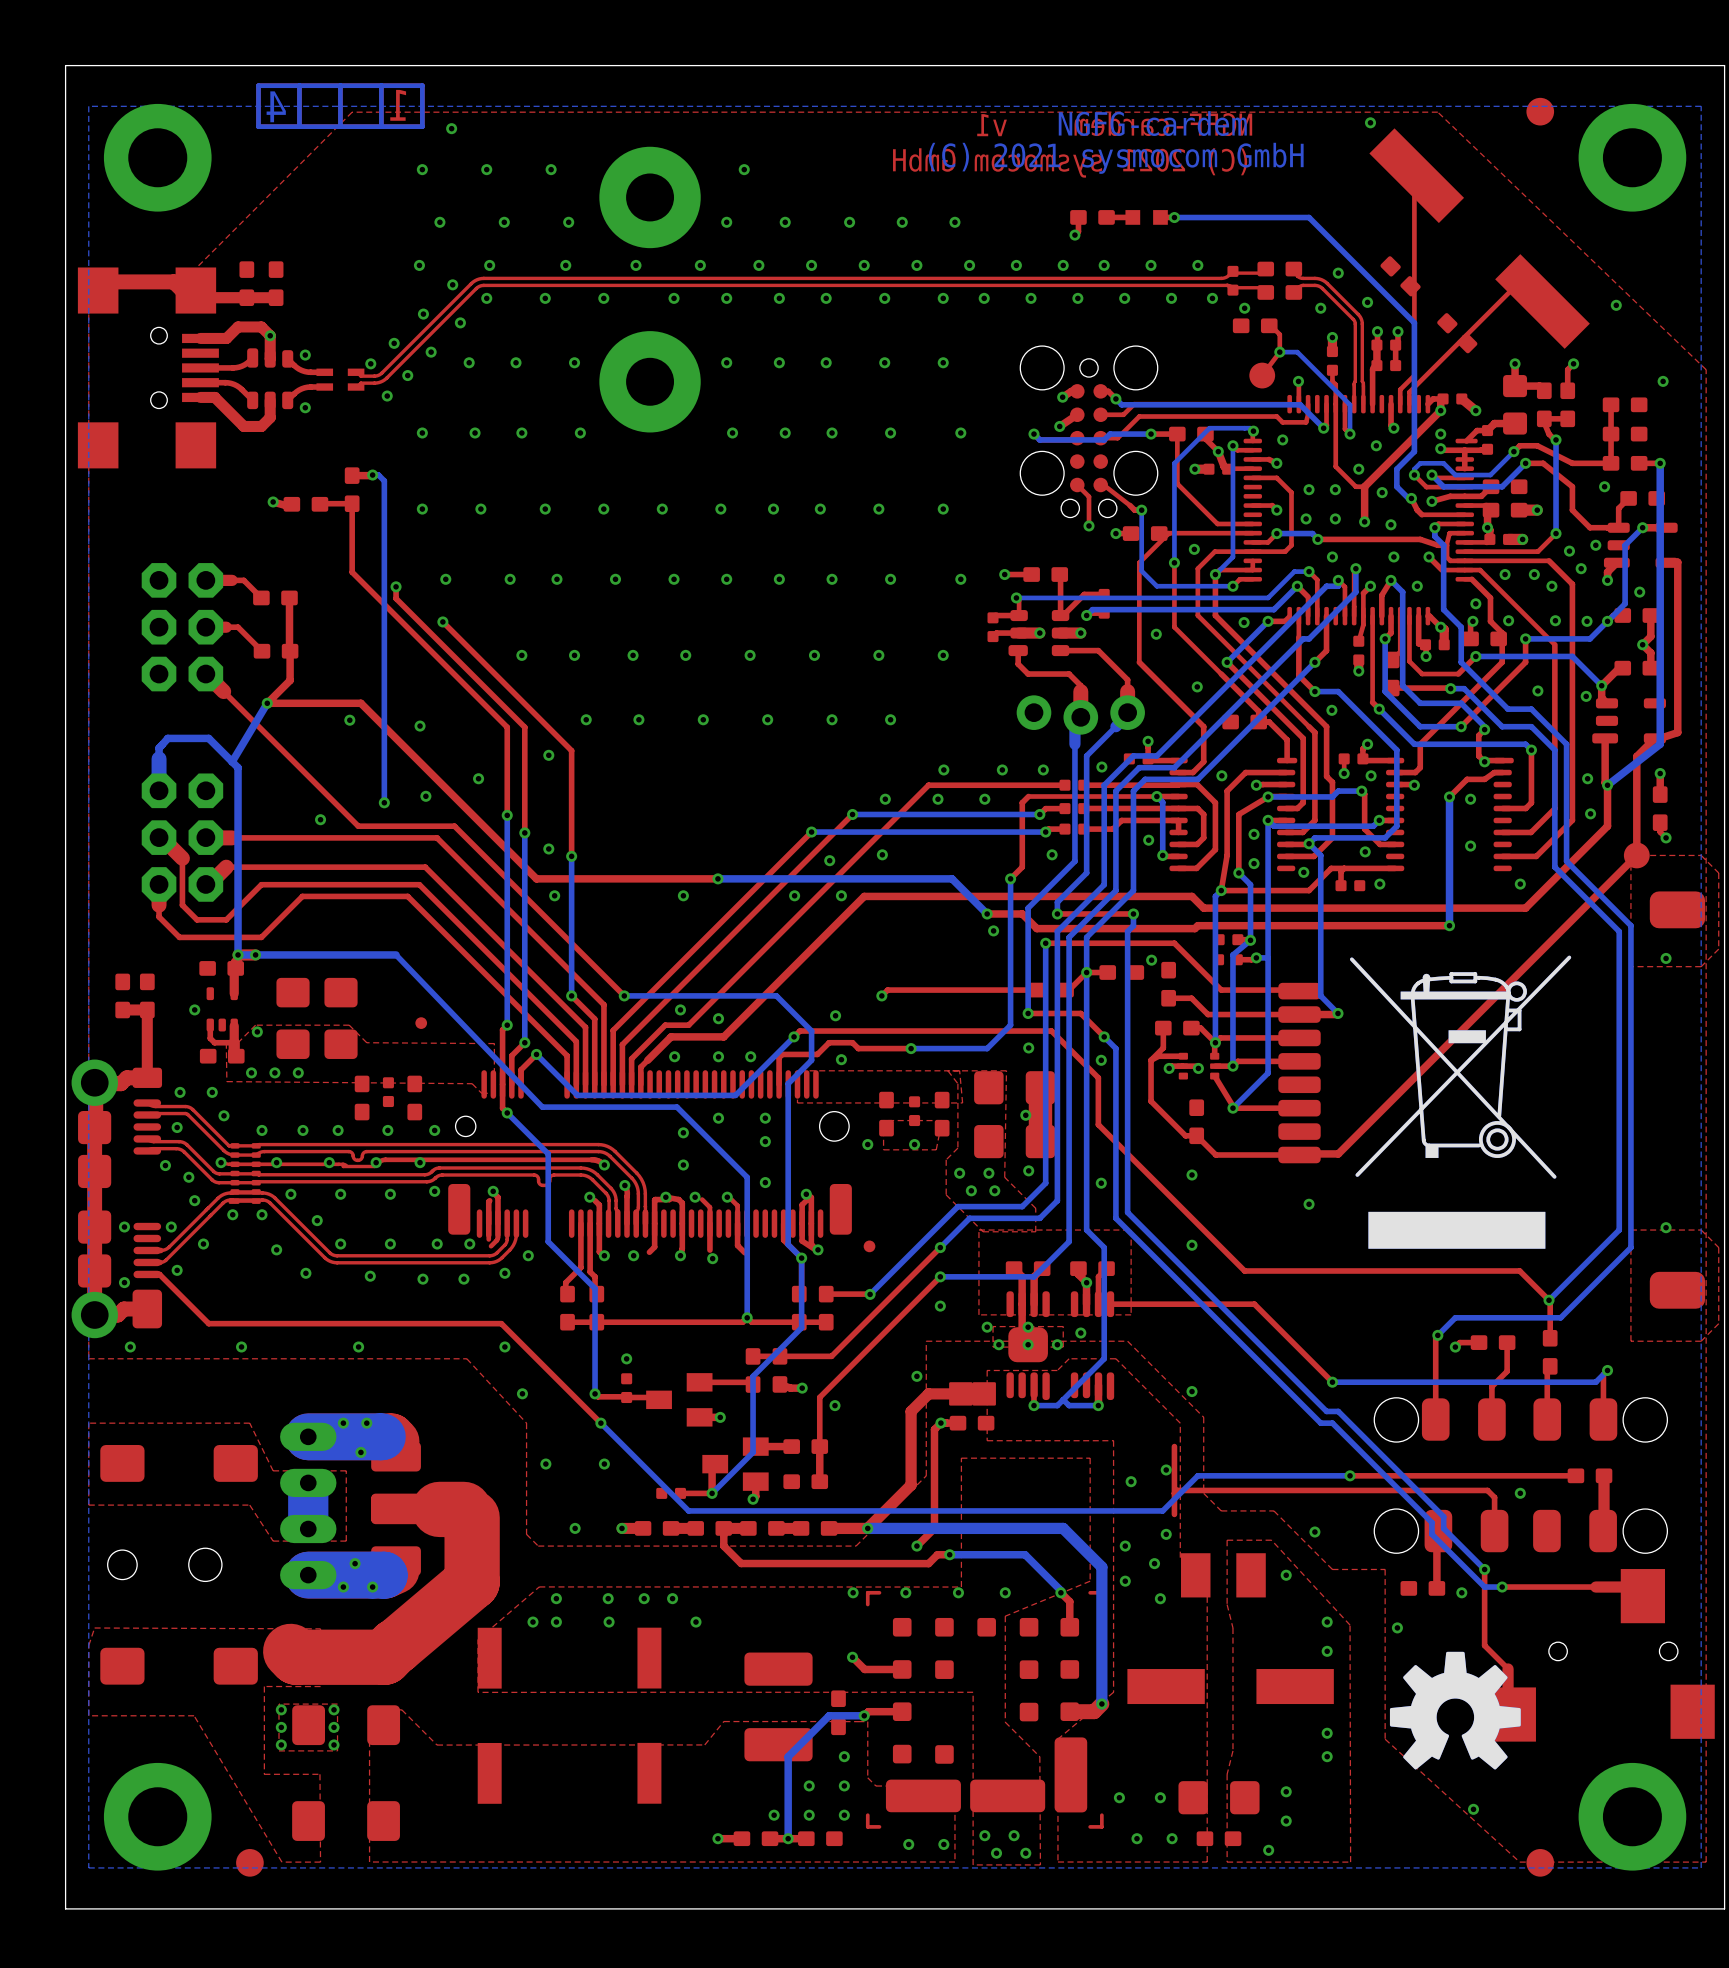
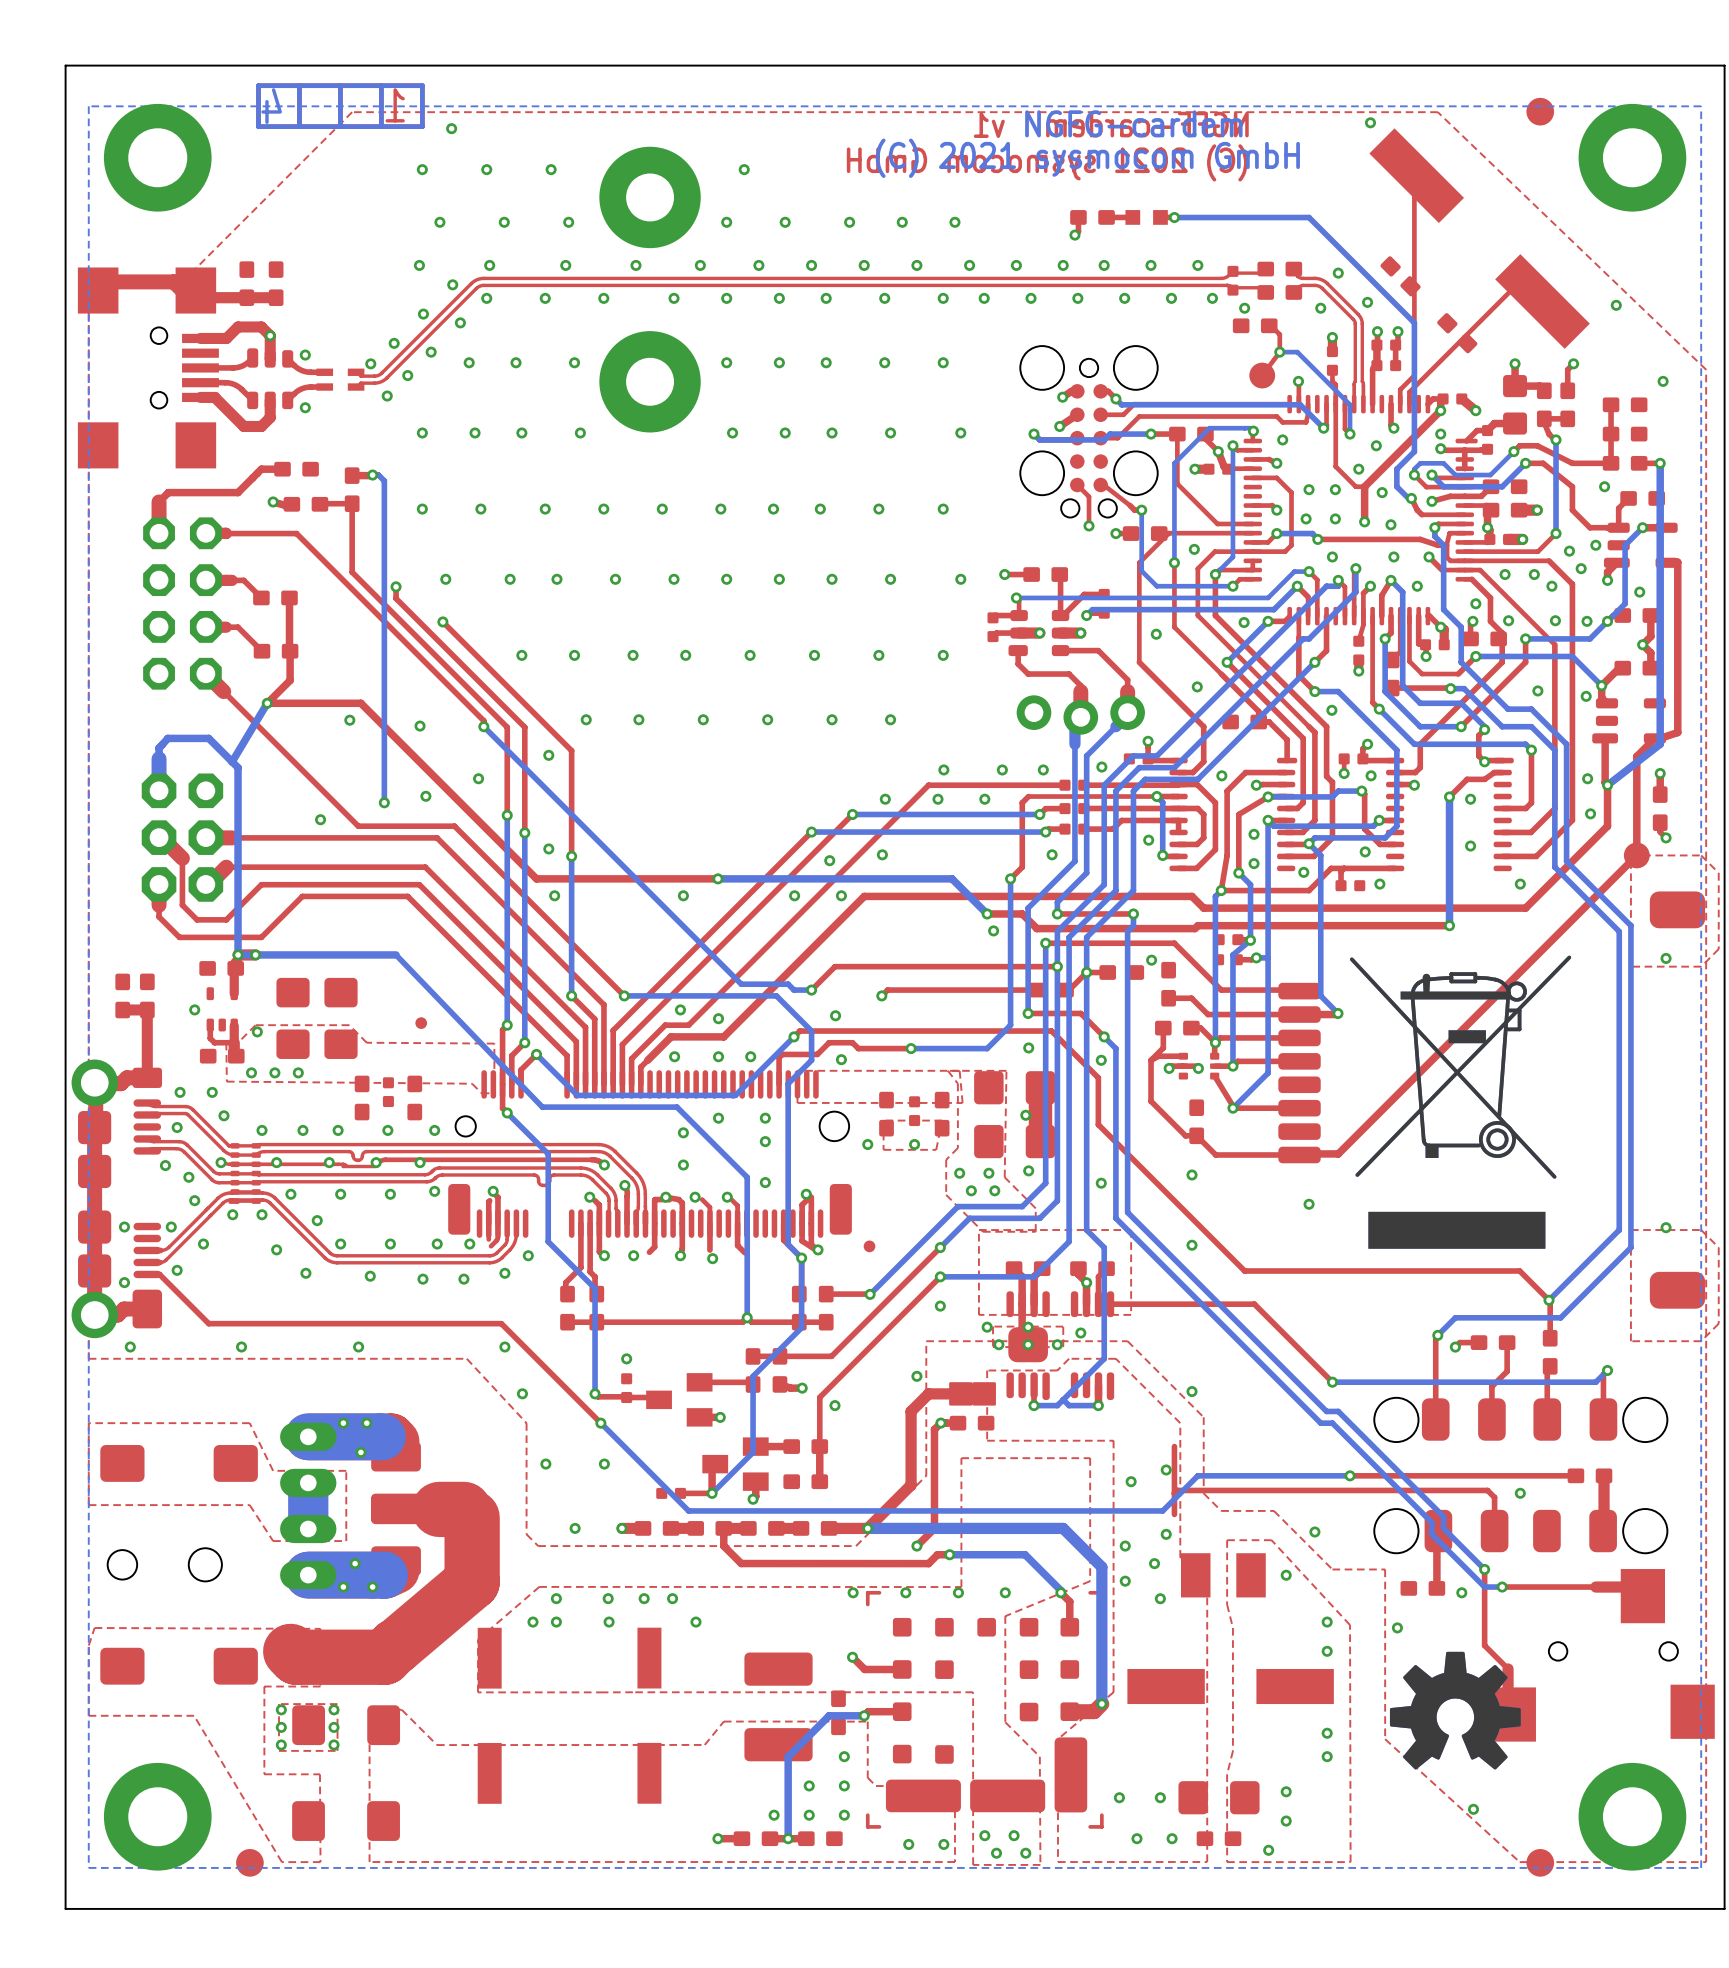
top track: none -> (282, 469) (261, 469) (238, 492) (168, 492) (159, 501) (159, 533)
part: none -> (296, 469)
top track: none -> (205, 533) (296, 533) (483, 720) (483, 726)
part: none -> (182, 603)
part: (182, 627) -> none
bottom track: none -> (483, 726) (741, 984) (788, 984) (794, 990) (811, 990)
via: none -> (483, 726)
top track: none -> (1057, 966) (834, 966) (811, 990)
via: none -> (1057, 966)
via: none -> (811, 990)

